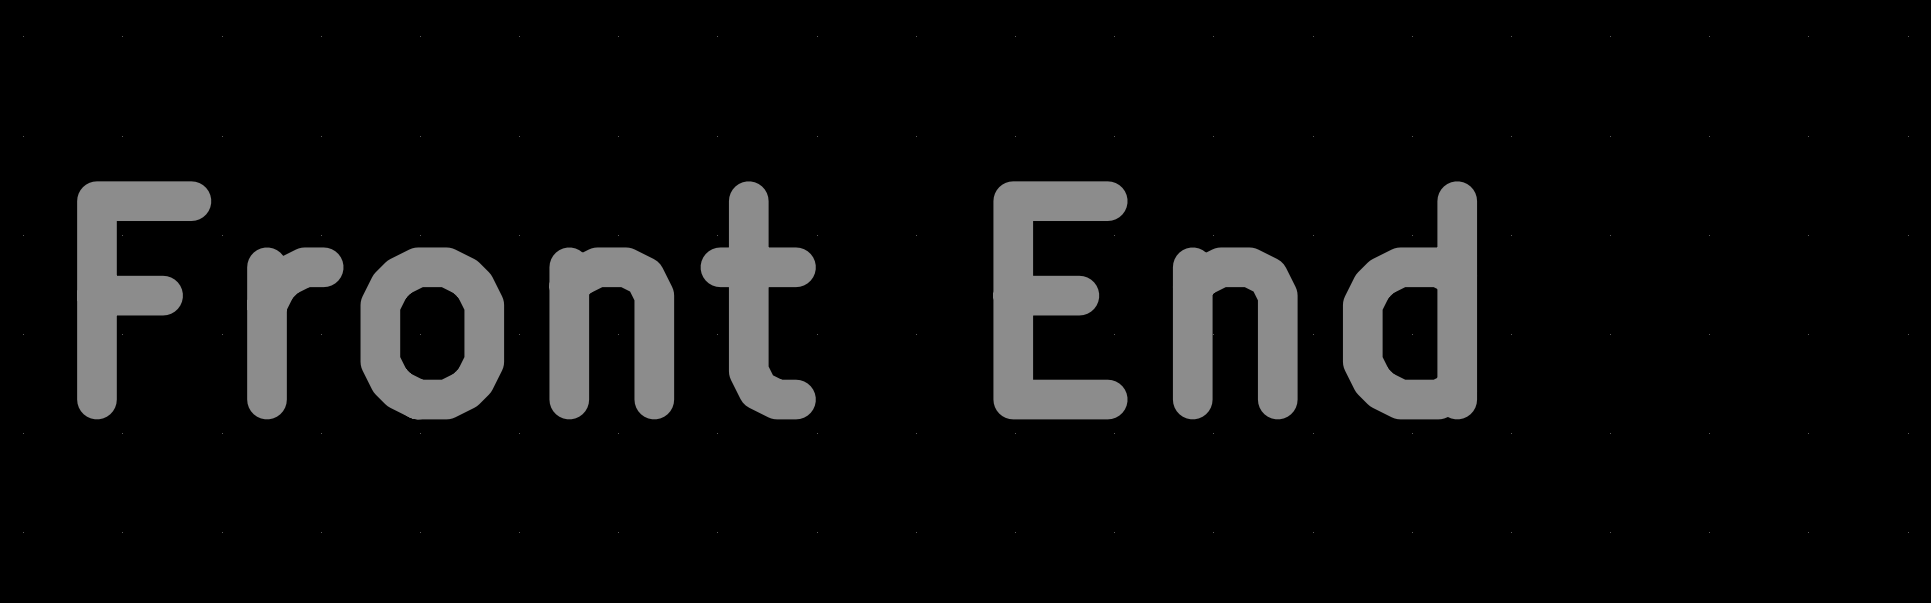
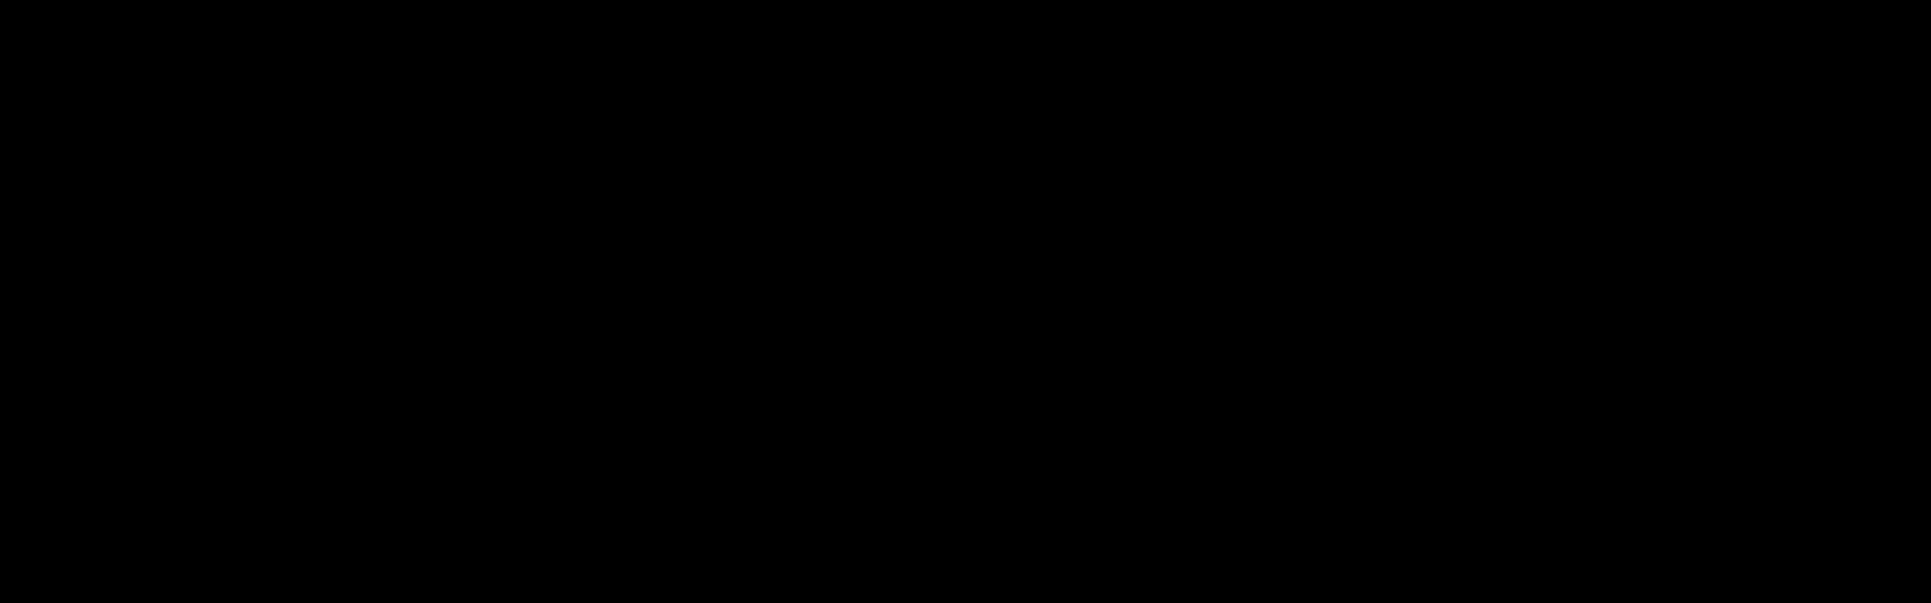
text: Front End (777, 300) -> none

